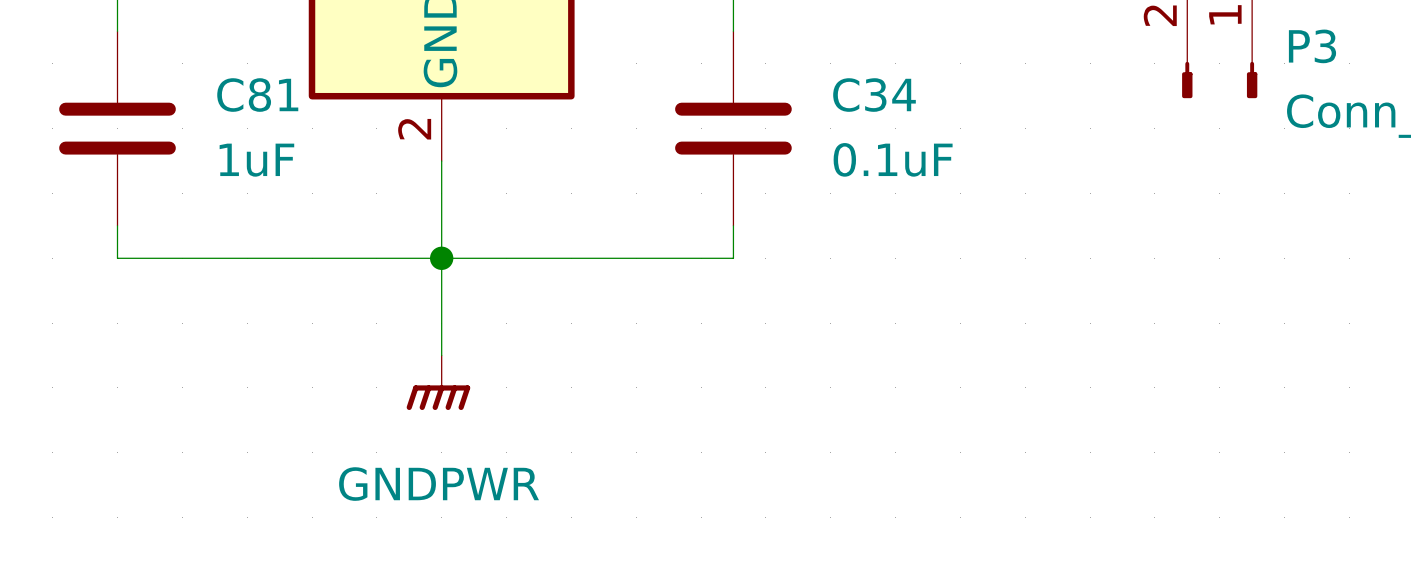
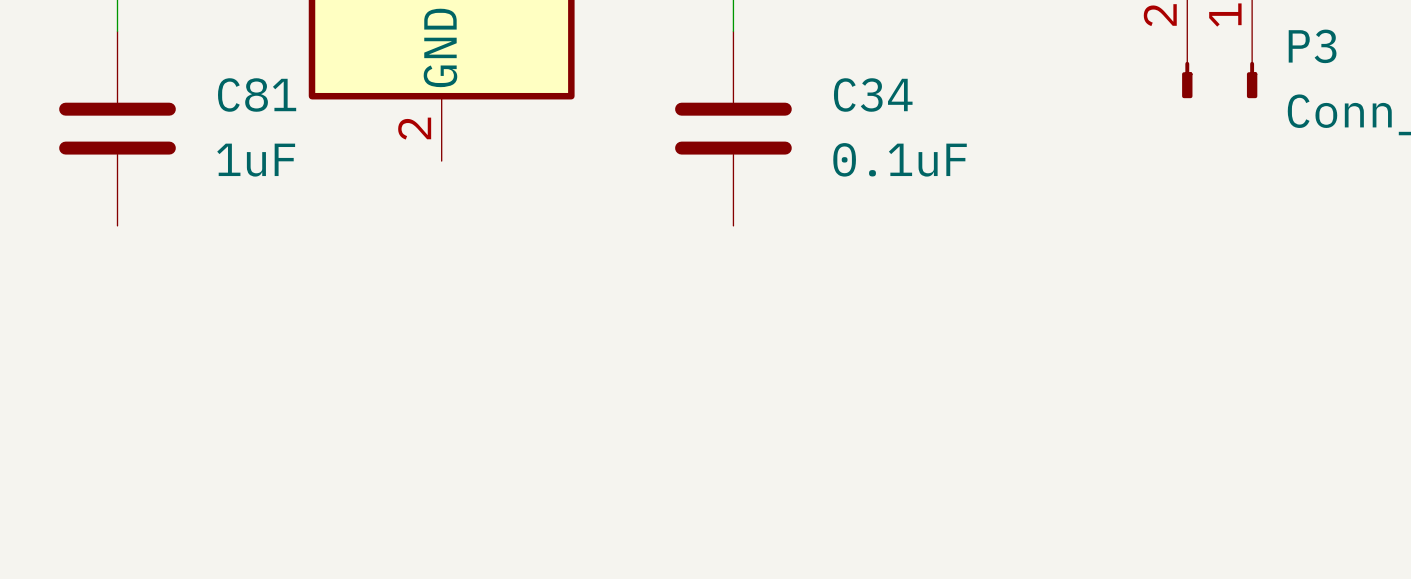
wire: (441, 161) (441, 355) -> none
wire: (117, 225) (117, 258) (733, 258) (733, 225) -> none
junction: (441, 258) -> none
power symbol: GNDPWR (438, 382) -> none

